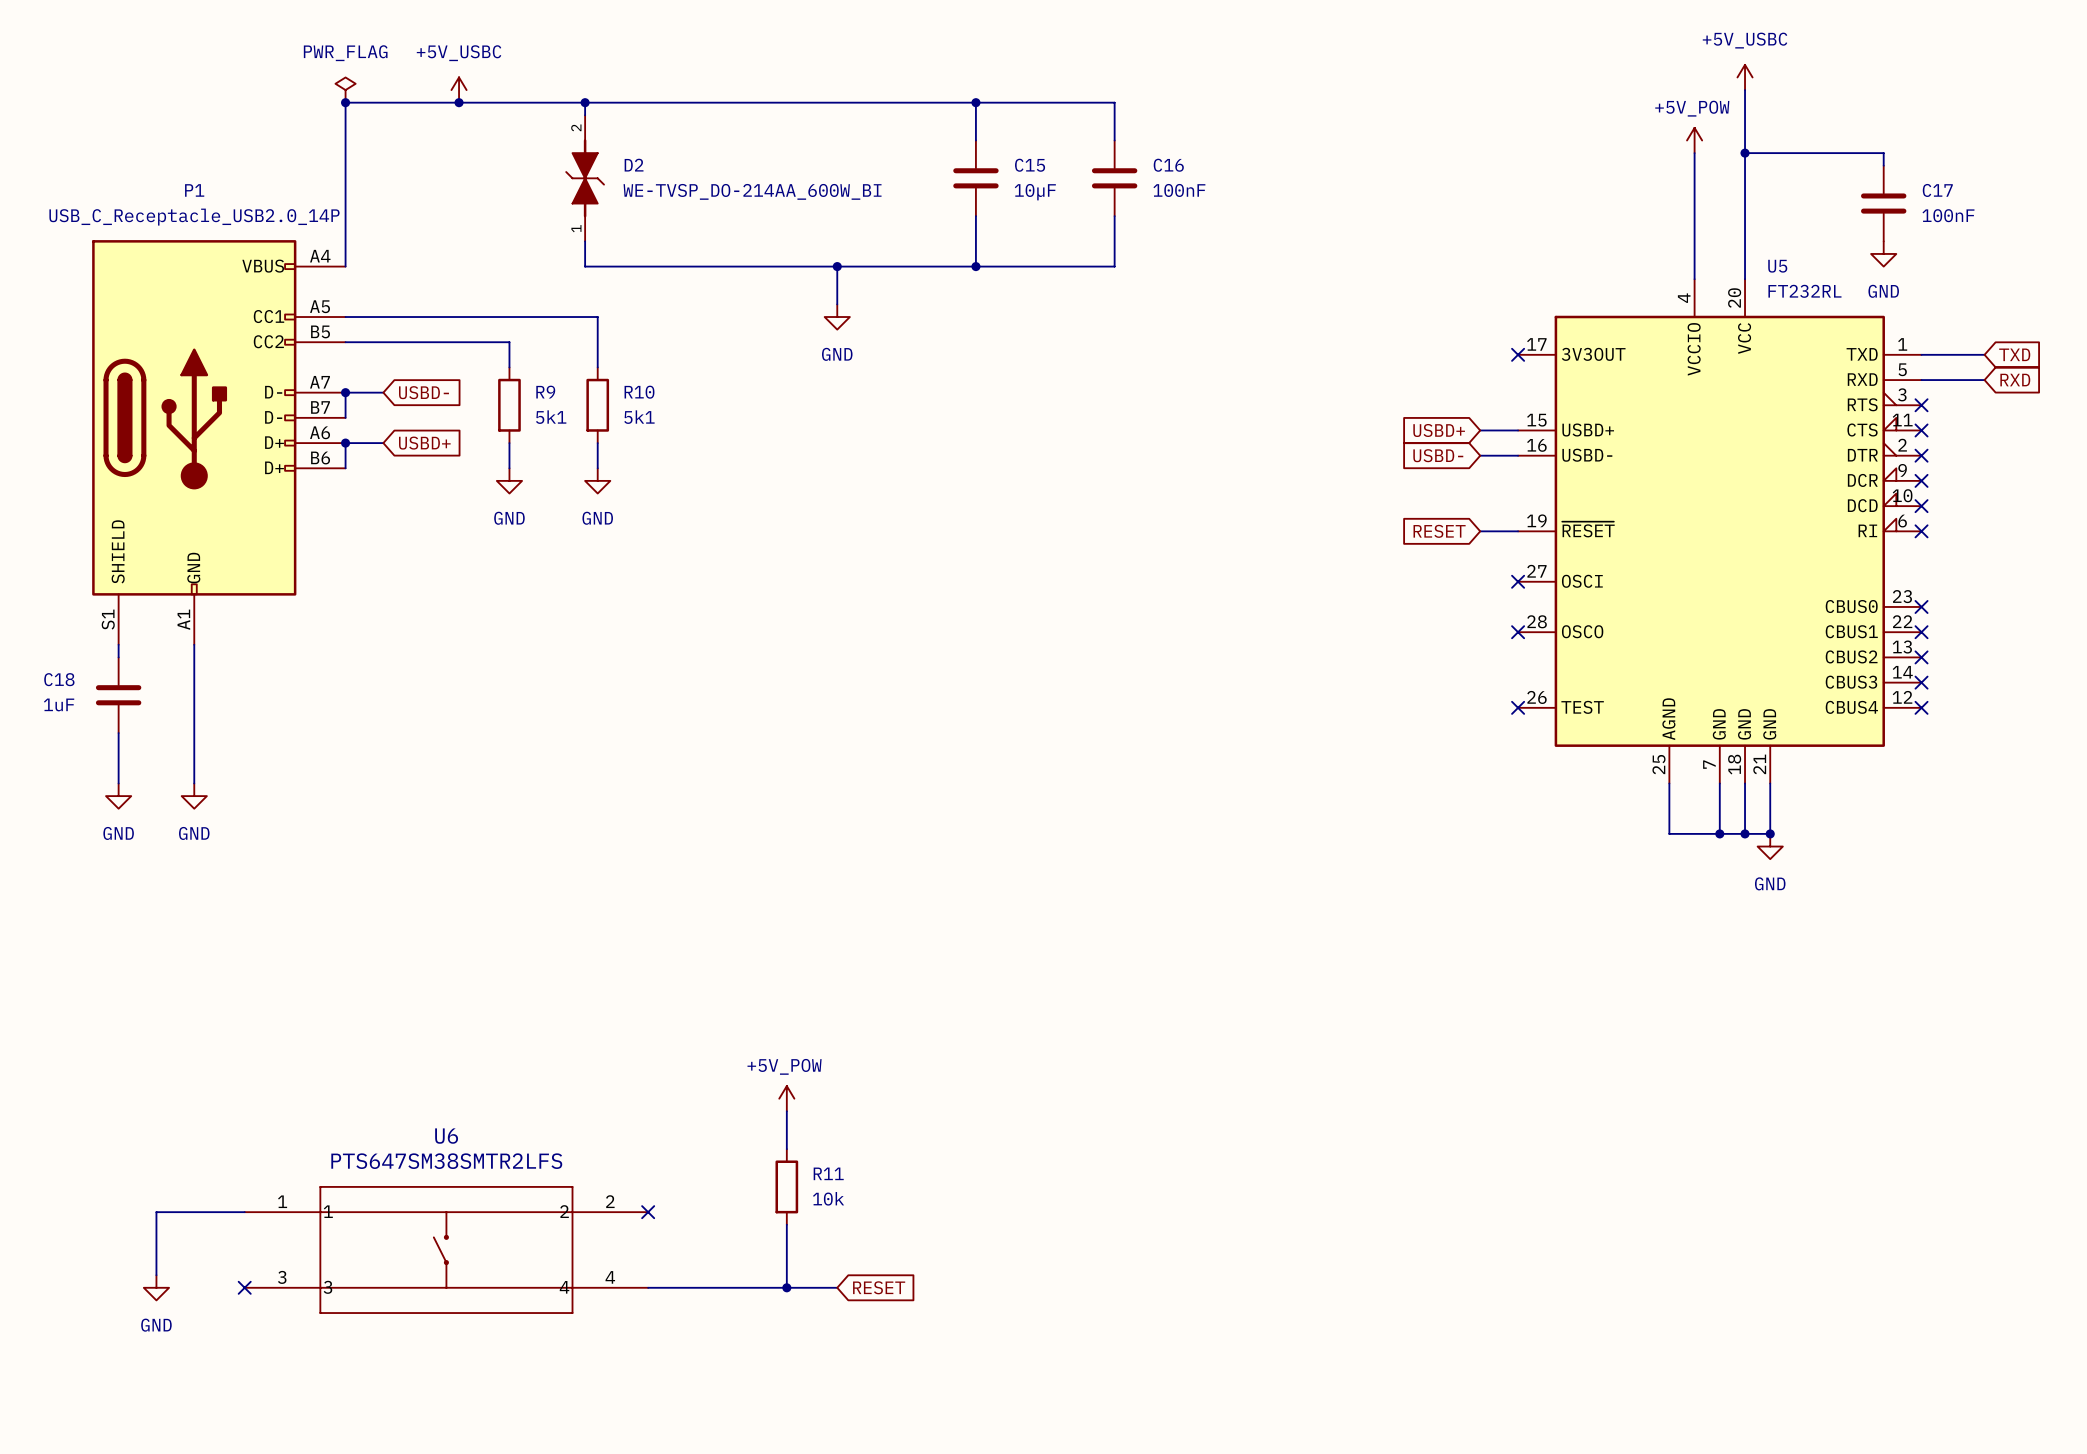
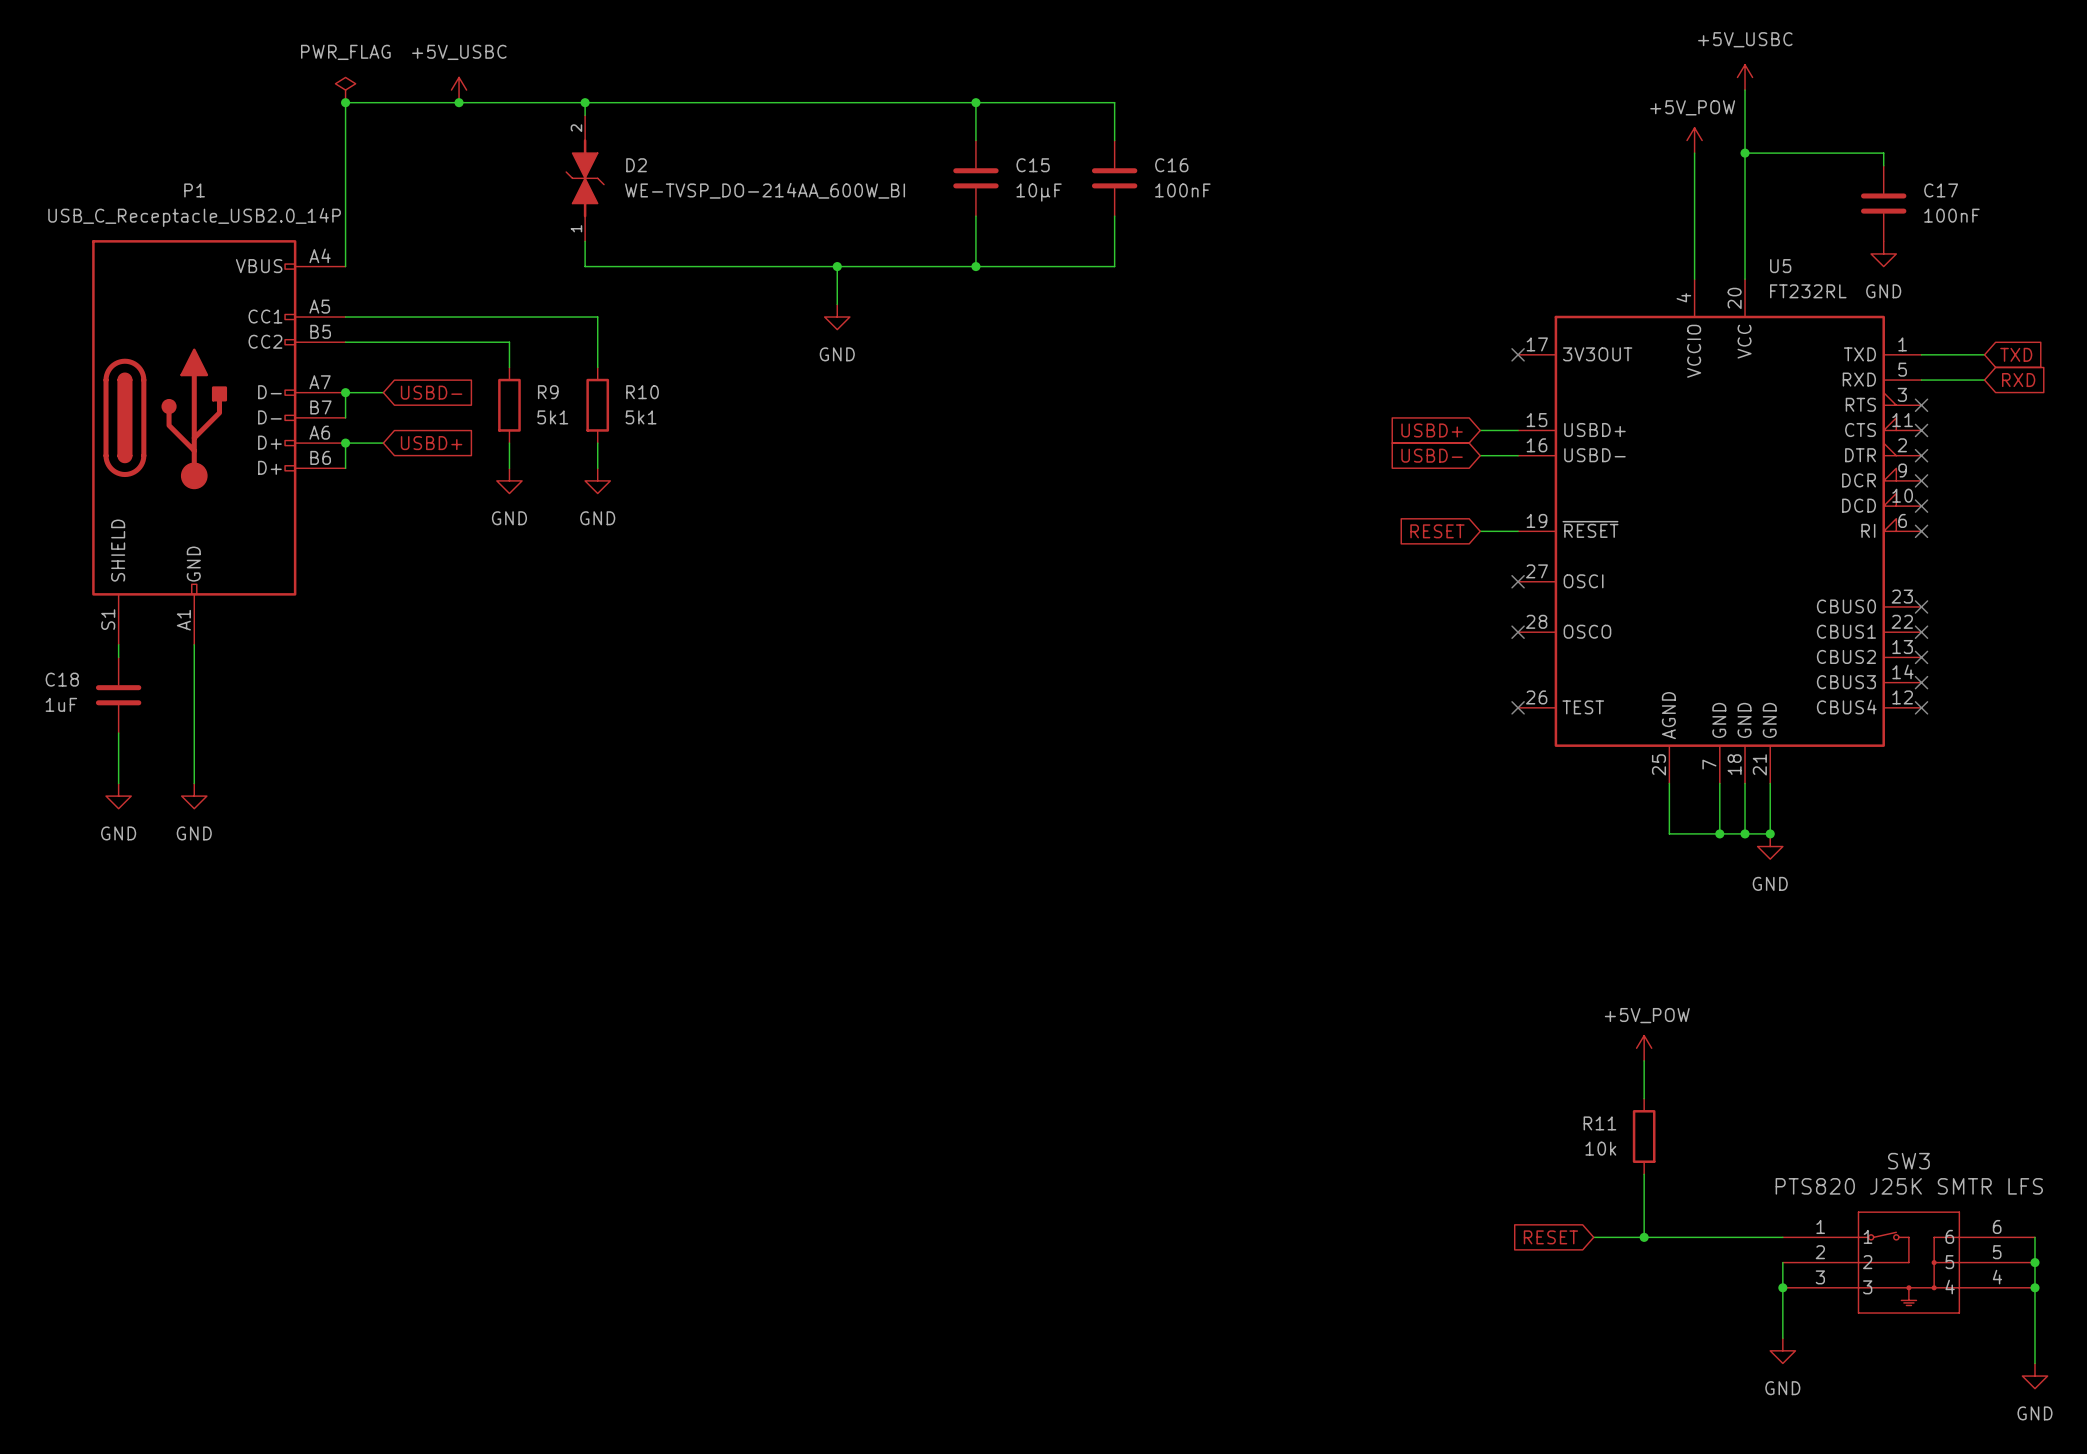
power symbol: none -> +5V_POW (1644, 1048)
wire: none -> (1644, 1060) (1644, 1098)
power symbol: +5V_POW (786, 1098) -> none
wire: (786, 1111) (786, 1149) -> none
R11 name position: R11 (828, 1173) -> R11 (1599, 1123)
wire: none -> (1644, 1174) (1644, 1237)
R11 position: (786, 1186) -> (1644, 1136)
R11 value position: 10k (828, 1198) -> 10k (1600, 1148)
wire: (244, 1212) (156, 1212) (156, 1275) -> none
no-connect mark: (648, 1212) -> none
wire: (786, 1224) (786, 1287) -> none
global label: none -> RESET (1550, 1237)
wire: none -> (1593, 1237) (1782, 1237)
junction: none -> (1644, 1237)
wire: none -> (2034, 1237) (2034, 1363)
U6: PTS647SM38SMTR2LFS (446, 1249) -> none
wire: none -> (1782, 1262) (1782, 1338)
SW3: none -> PTS820 J25K SMTR LFS (1908, 1262)
junction: none -> (2034, 1262)
power symbol: GND (156, 1287) -> none
no-connect mark: (244, 1287) -> none
wire: (648, 1287) (837, 1287) -> none
junction: (786, 1287) -> none
global label: RESET (879, 1287) -> none
junction: none -> (1782, 1287)
junction: none -> (2034, 1287)
power symbol: none -> GND (1782, 1350)
power symbol: none -> GND (2034, 1376)

